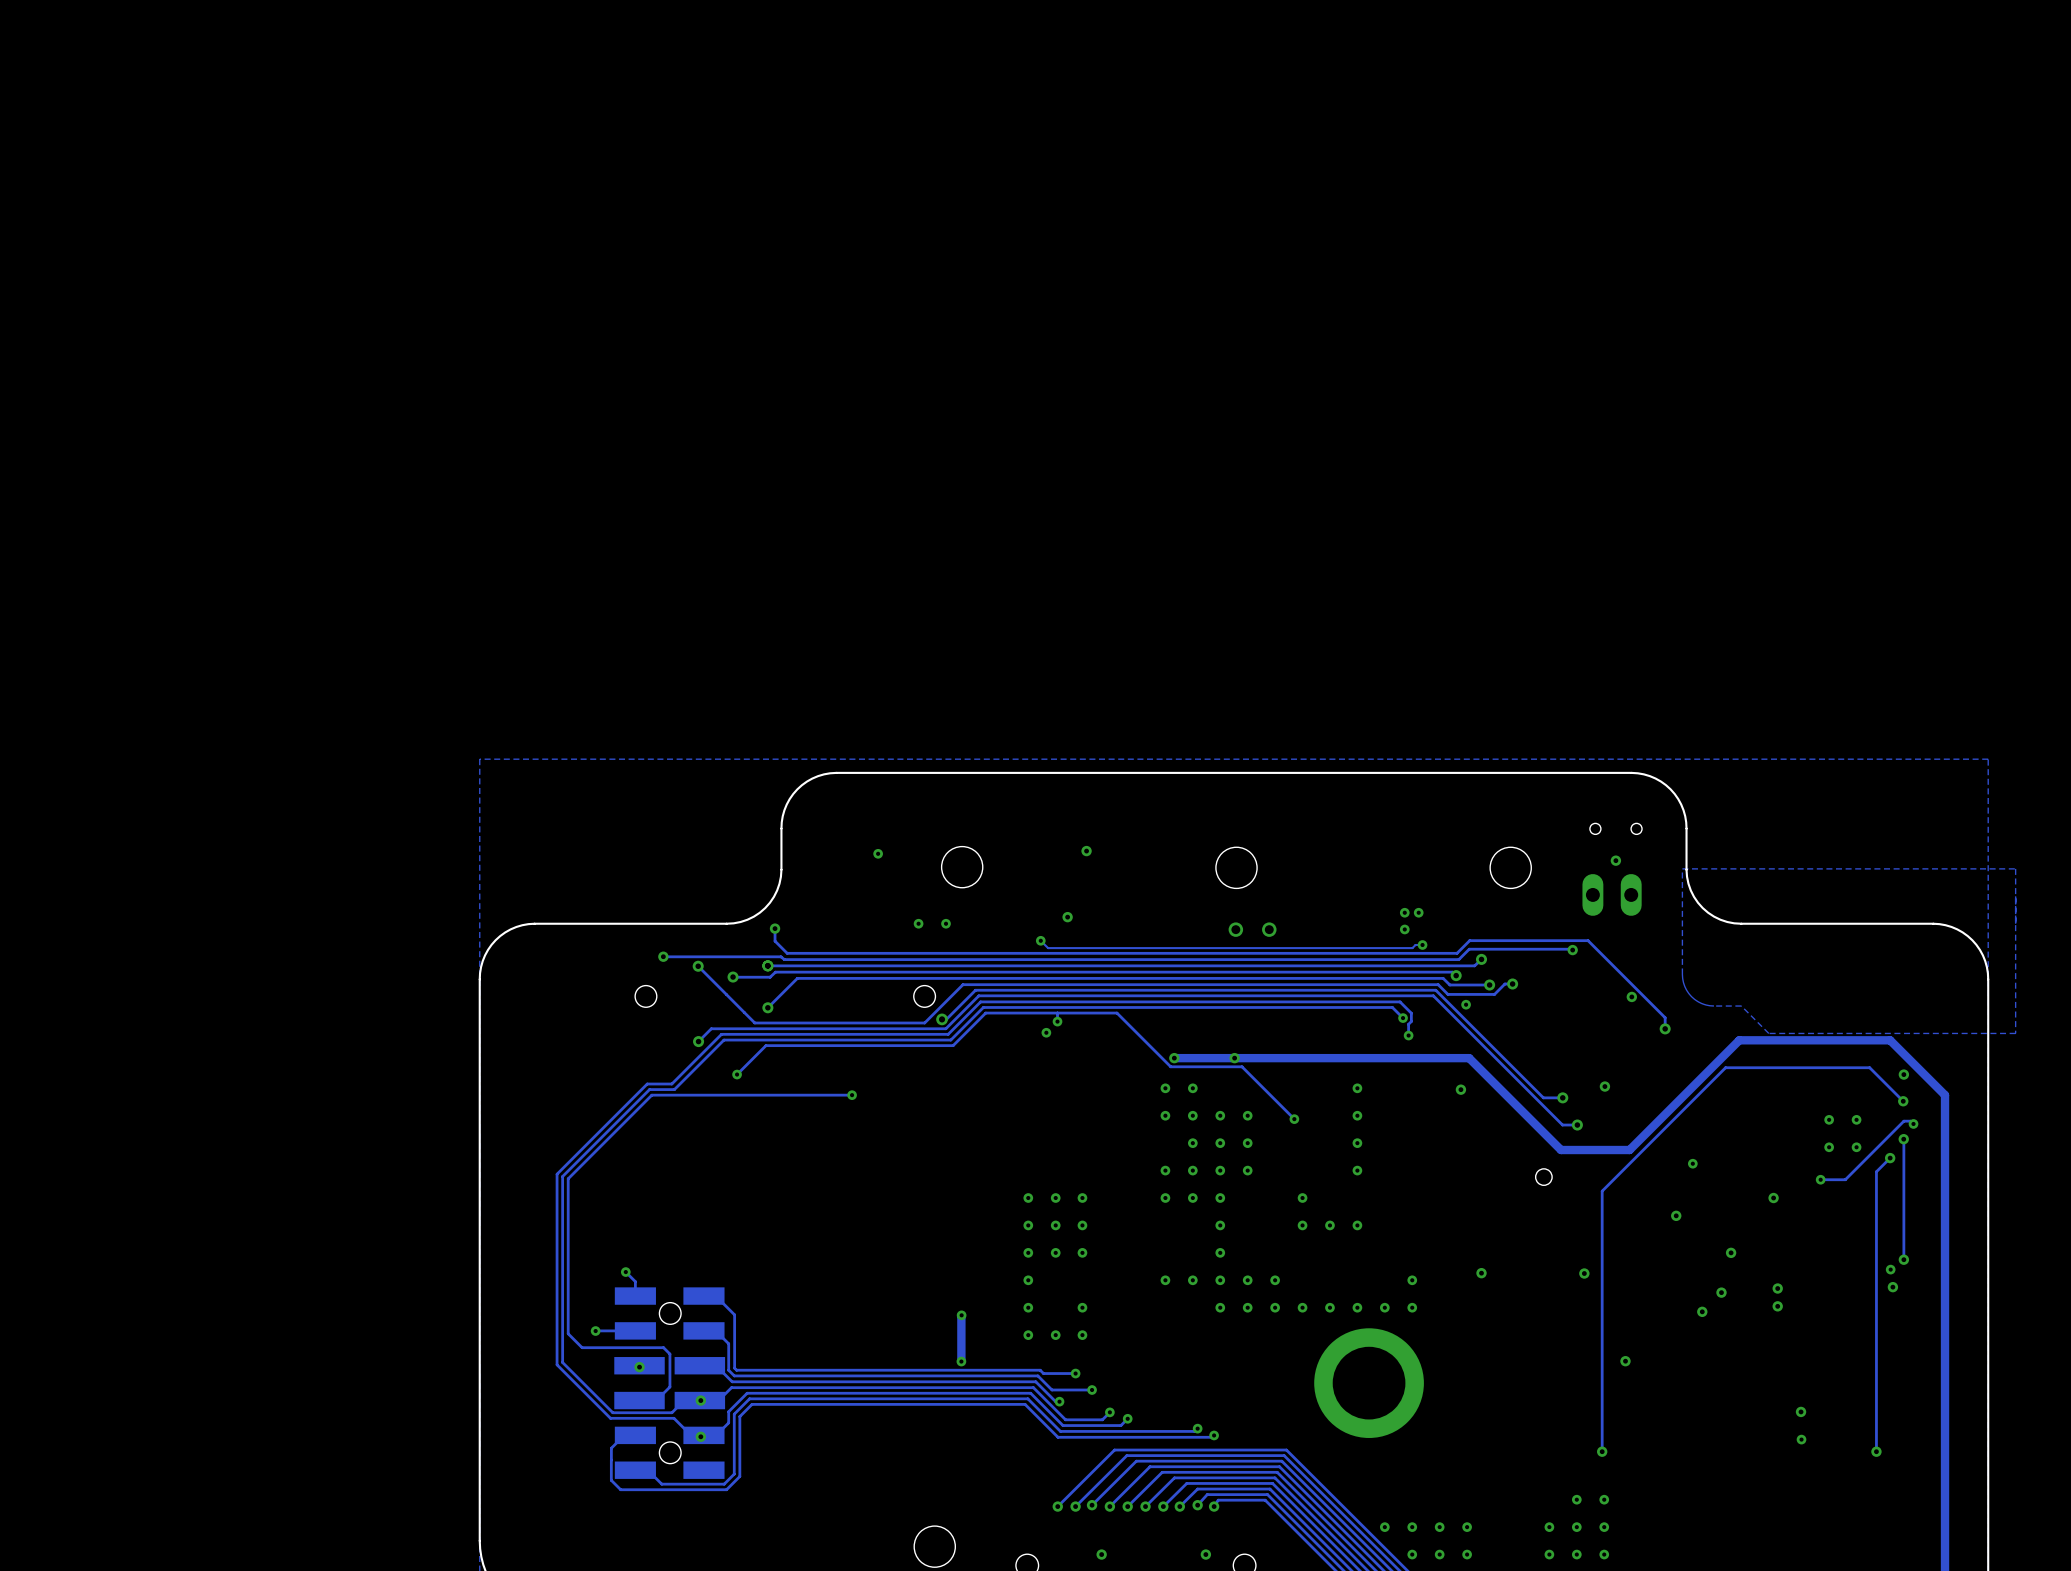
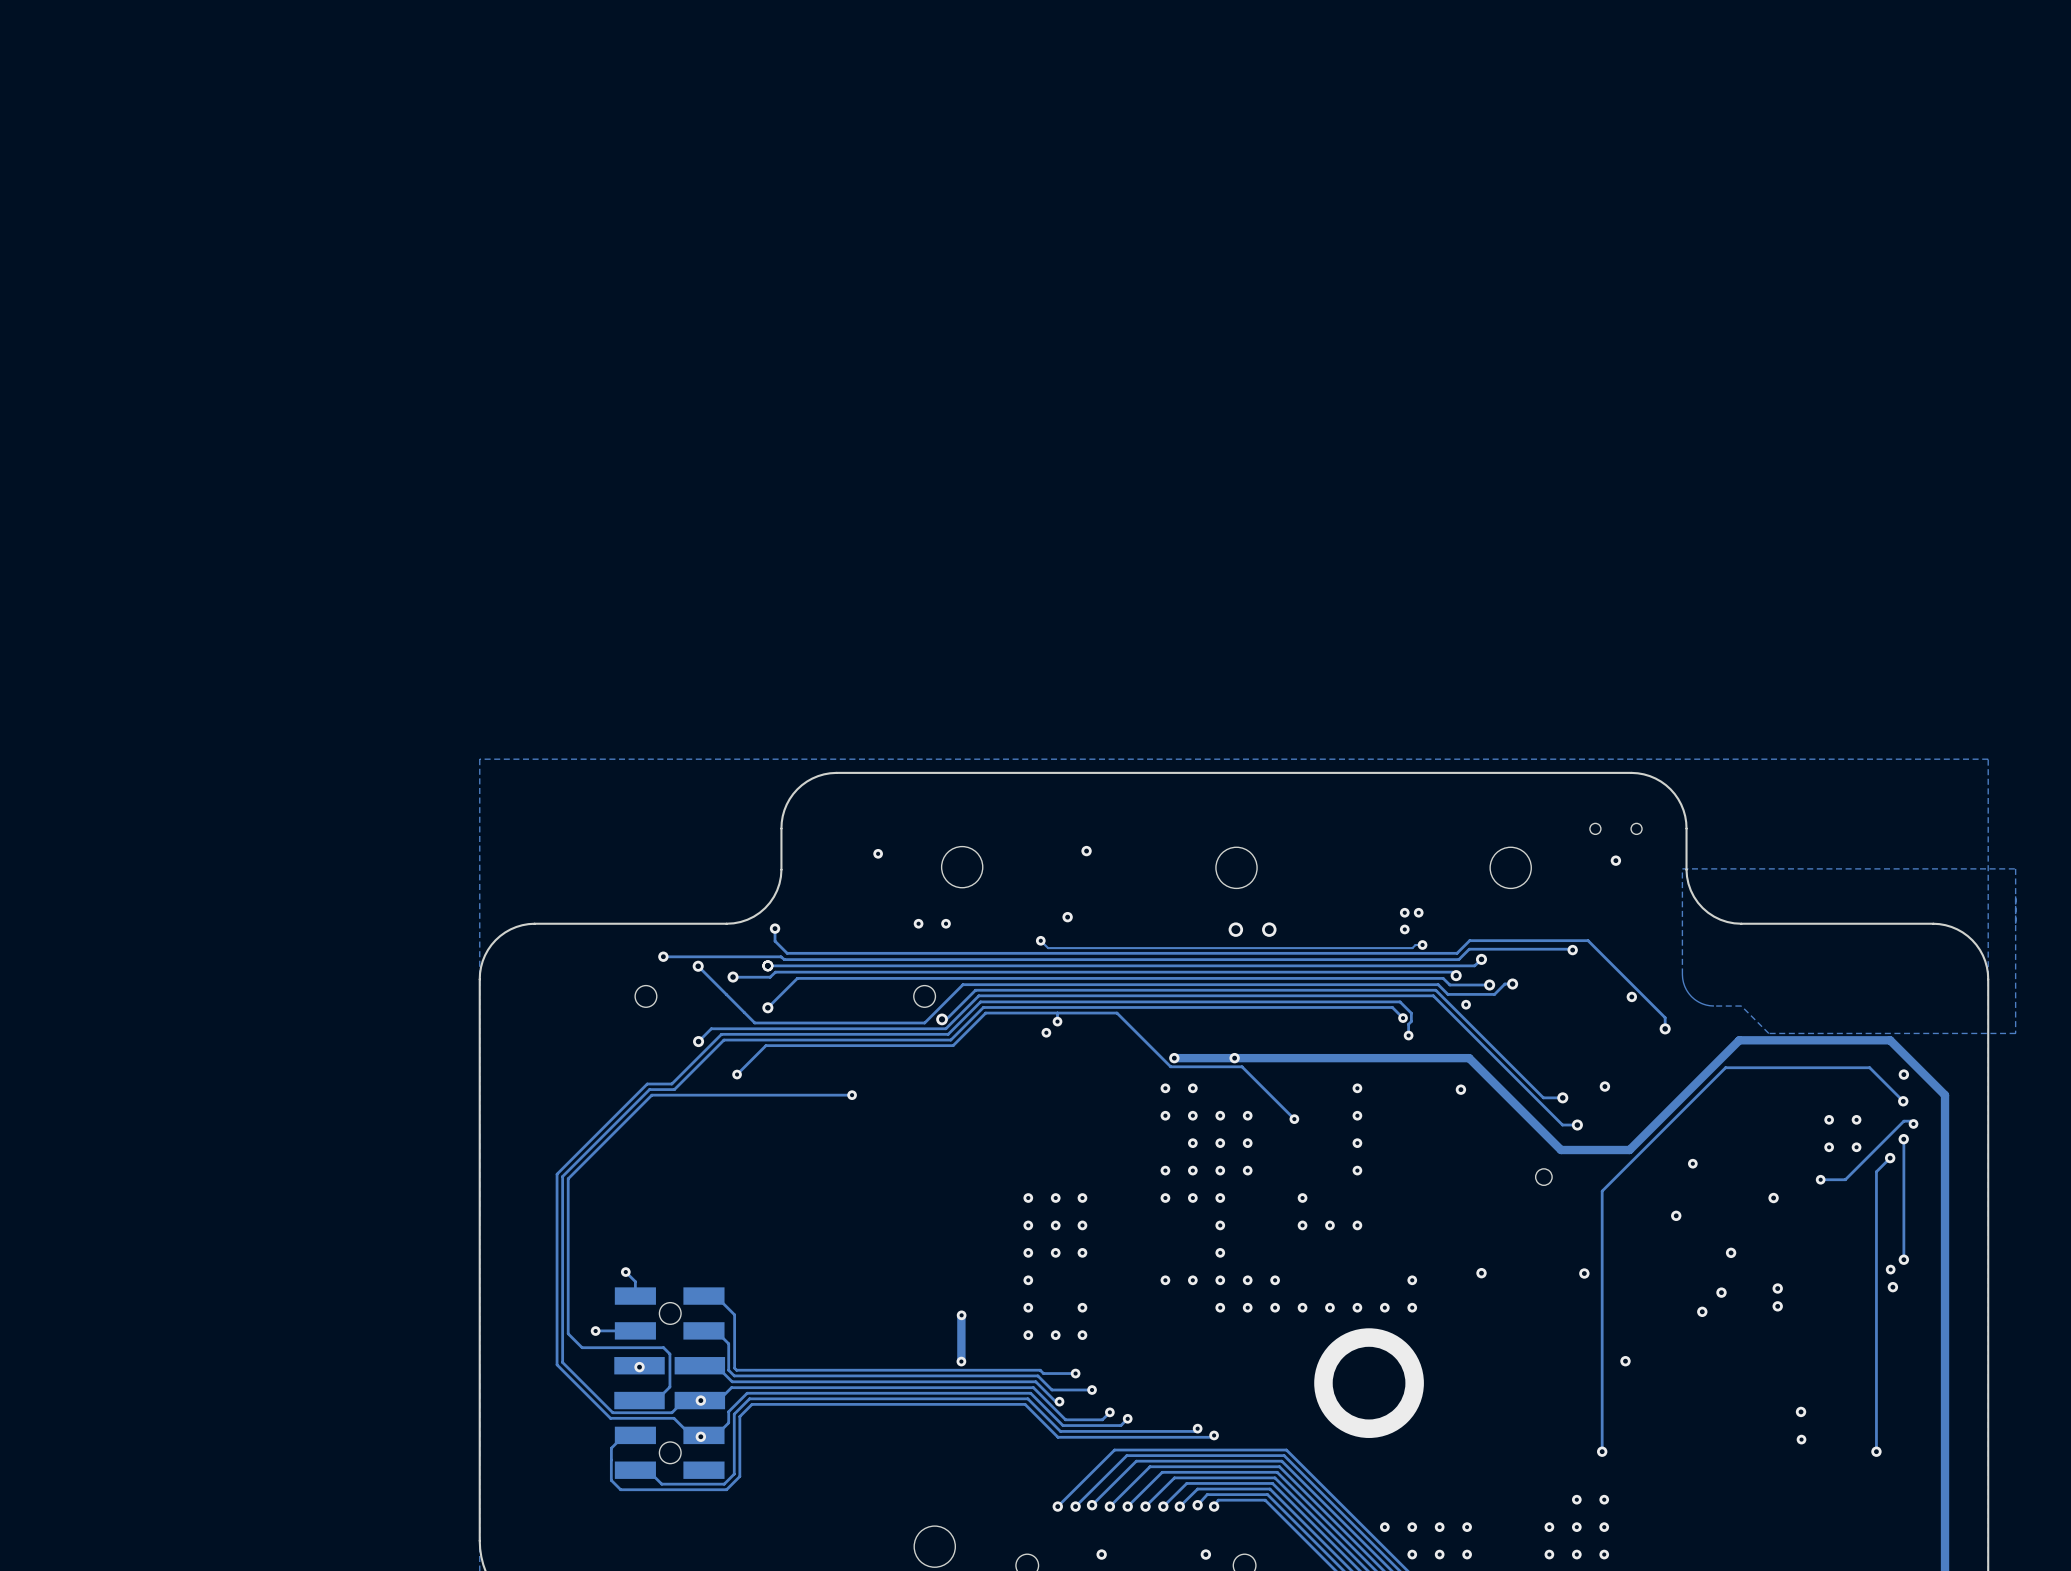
part: (1612, 894) -> none

